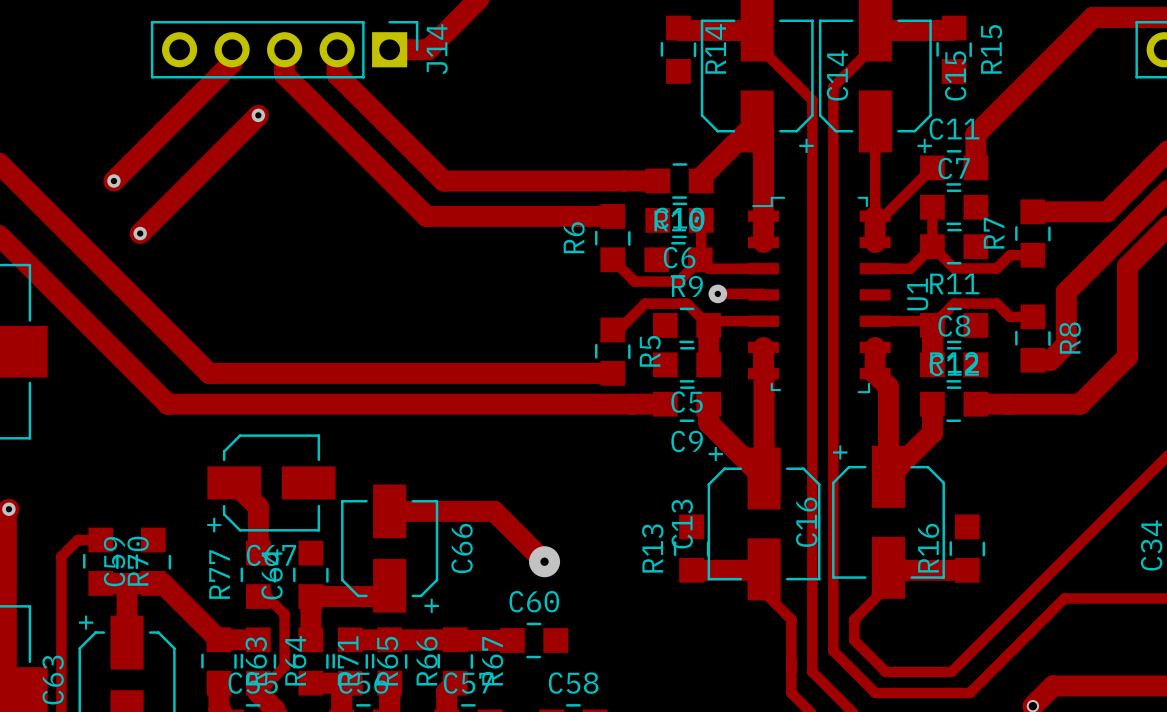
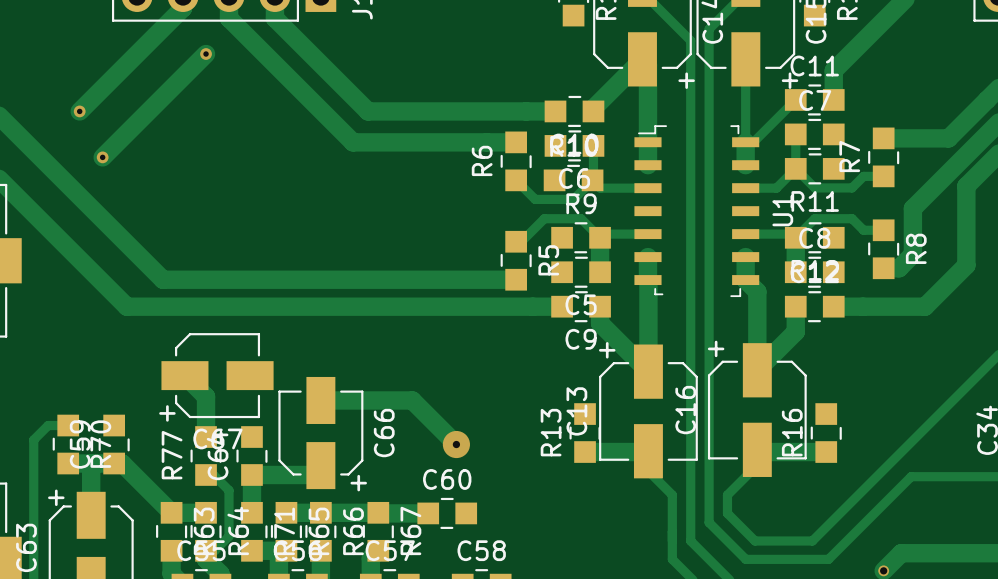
track: (717, 293) (763, 294) -> none
via: (717, 293) -> none

